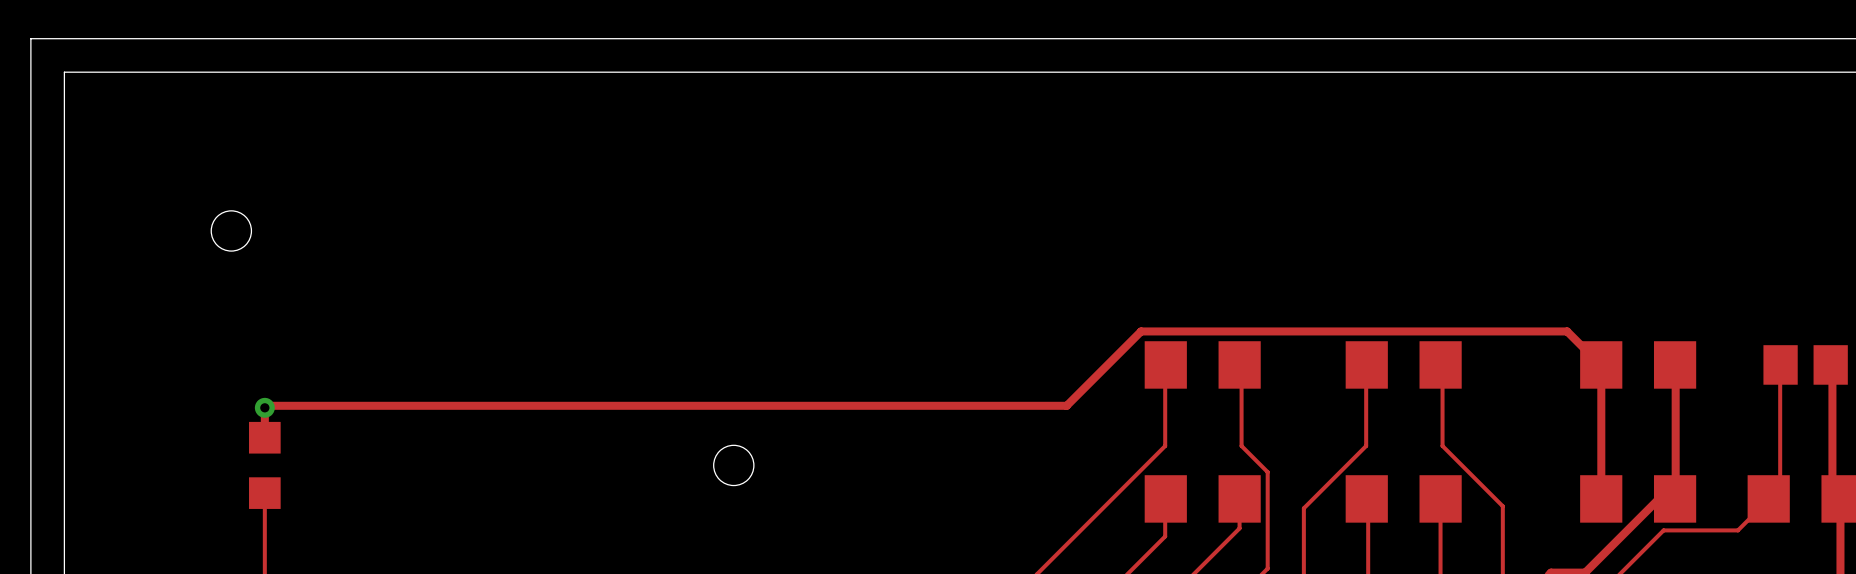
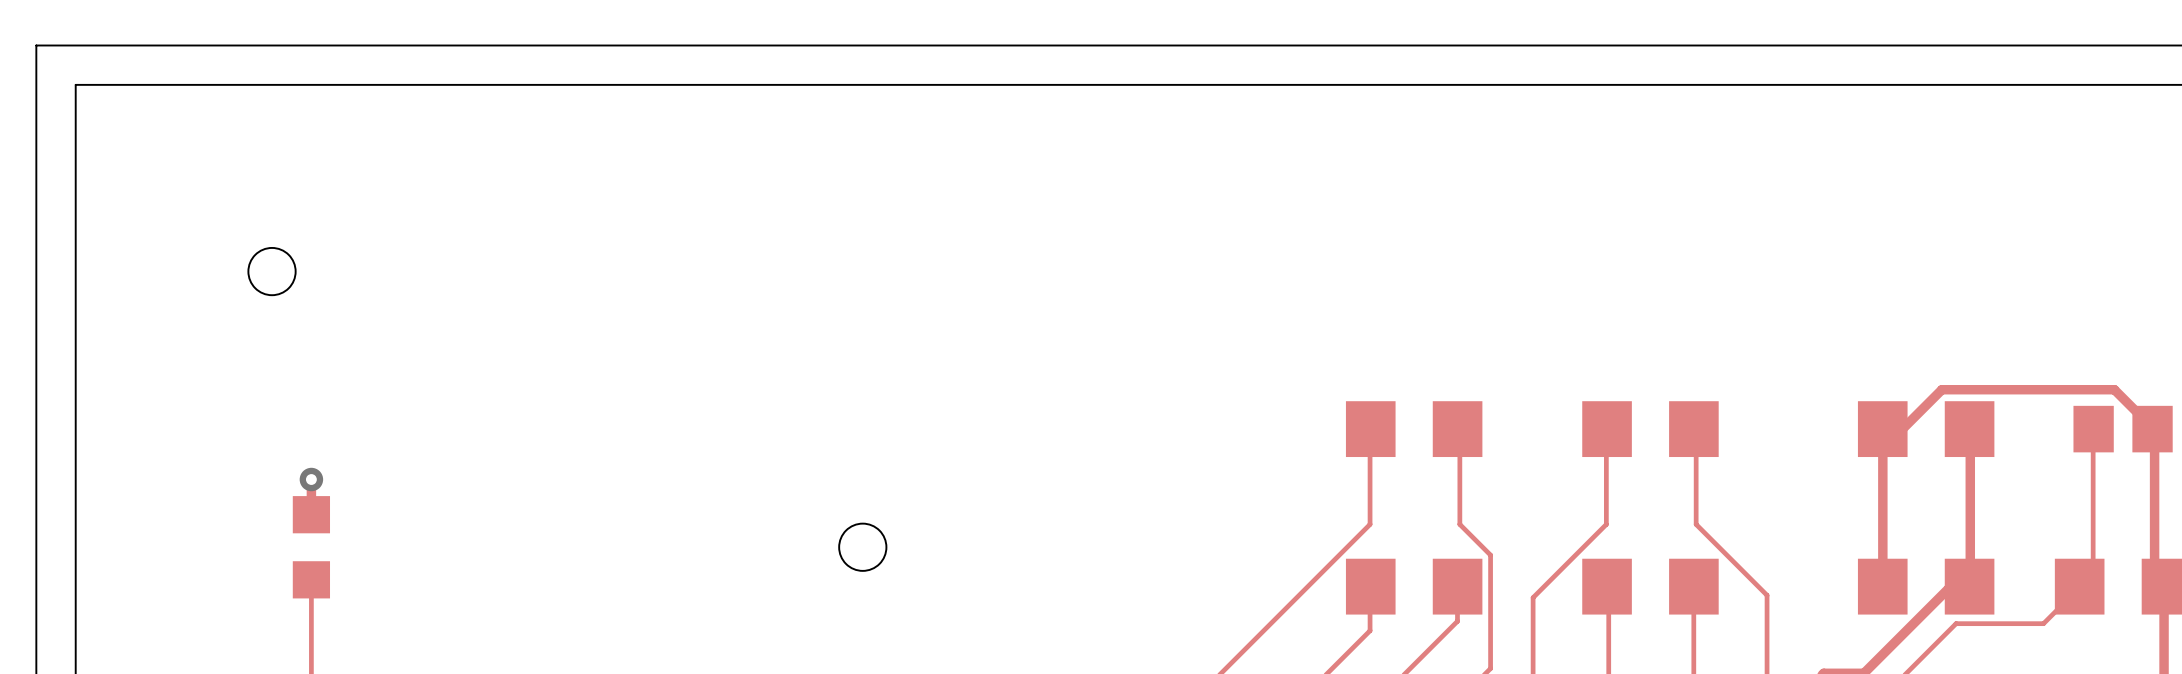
top track: (1601, 367) (1601, 364) (1567, 331) (1141, 331) (1066, 405) (266, 405) (264, 407) -> (1882, 432) (1882, 429) (1901, 429) (1941, 389) (2114, 389) (2152, 429)

